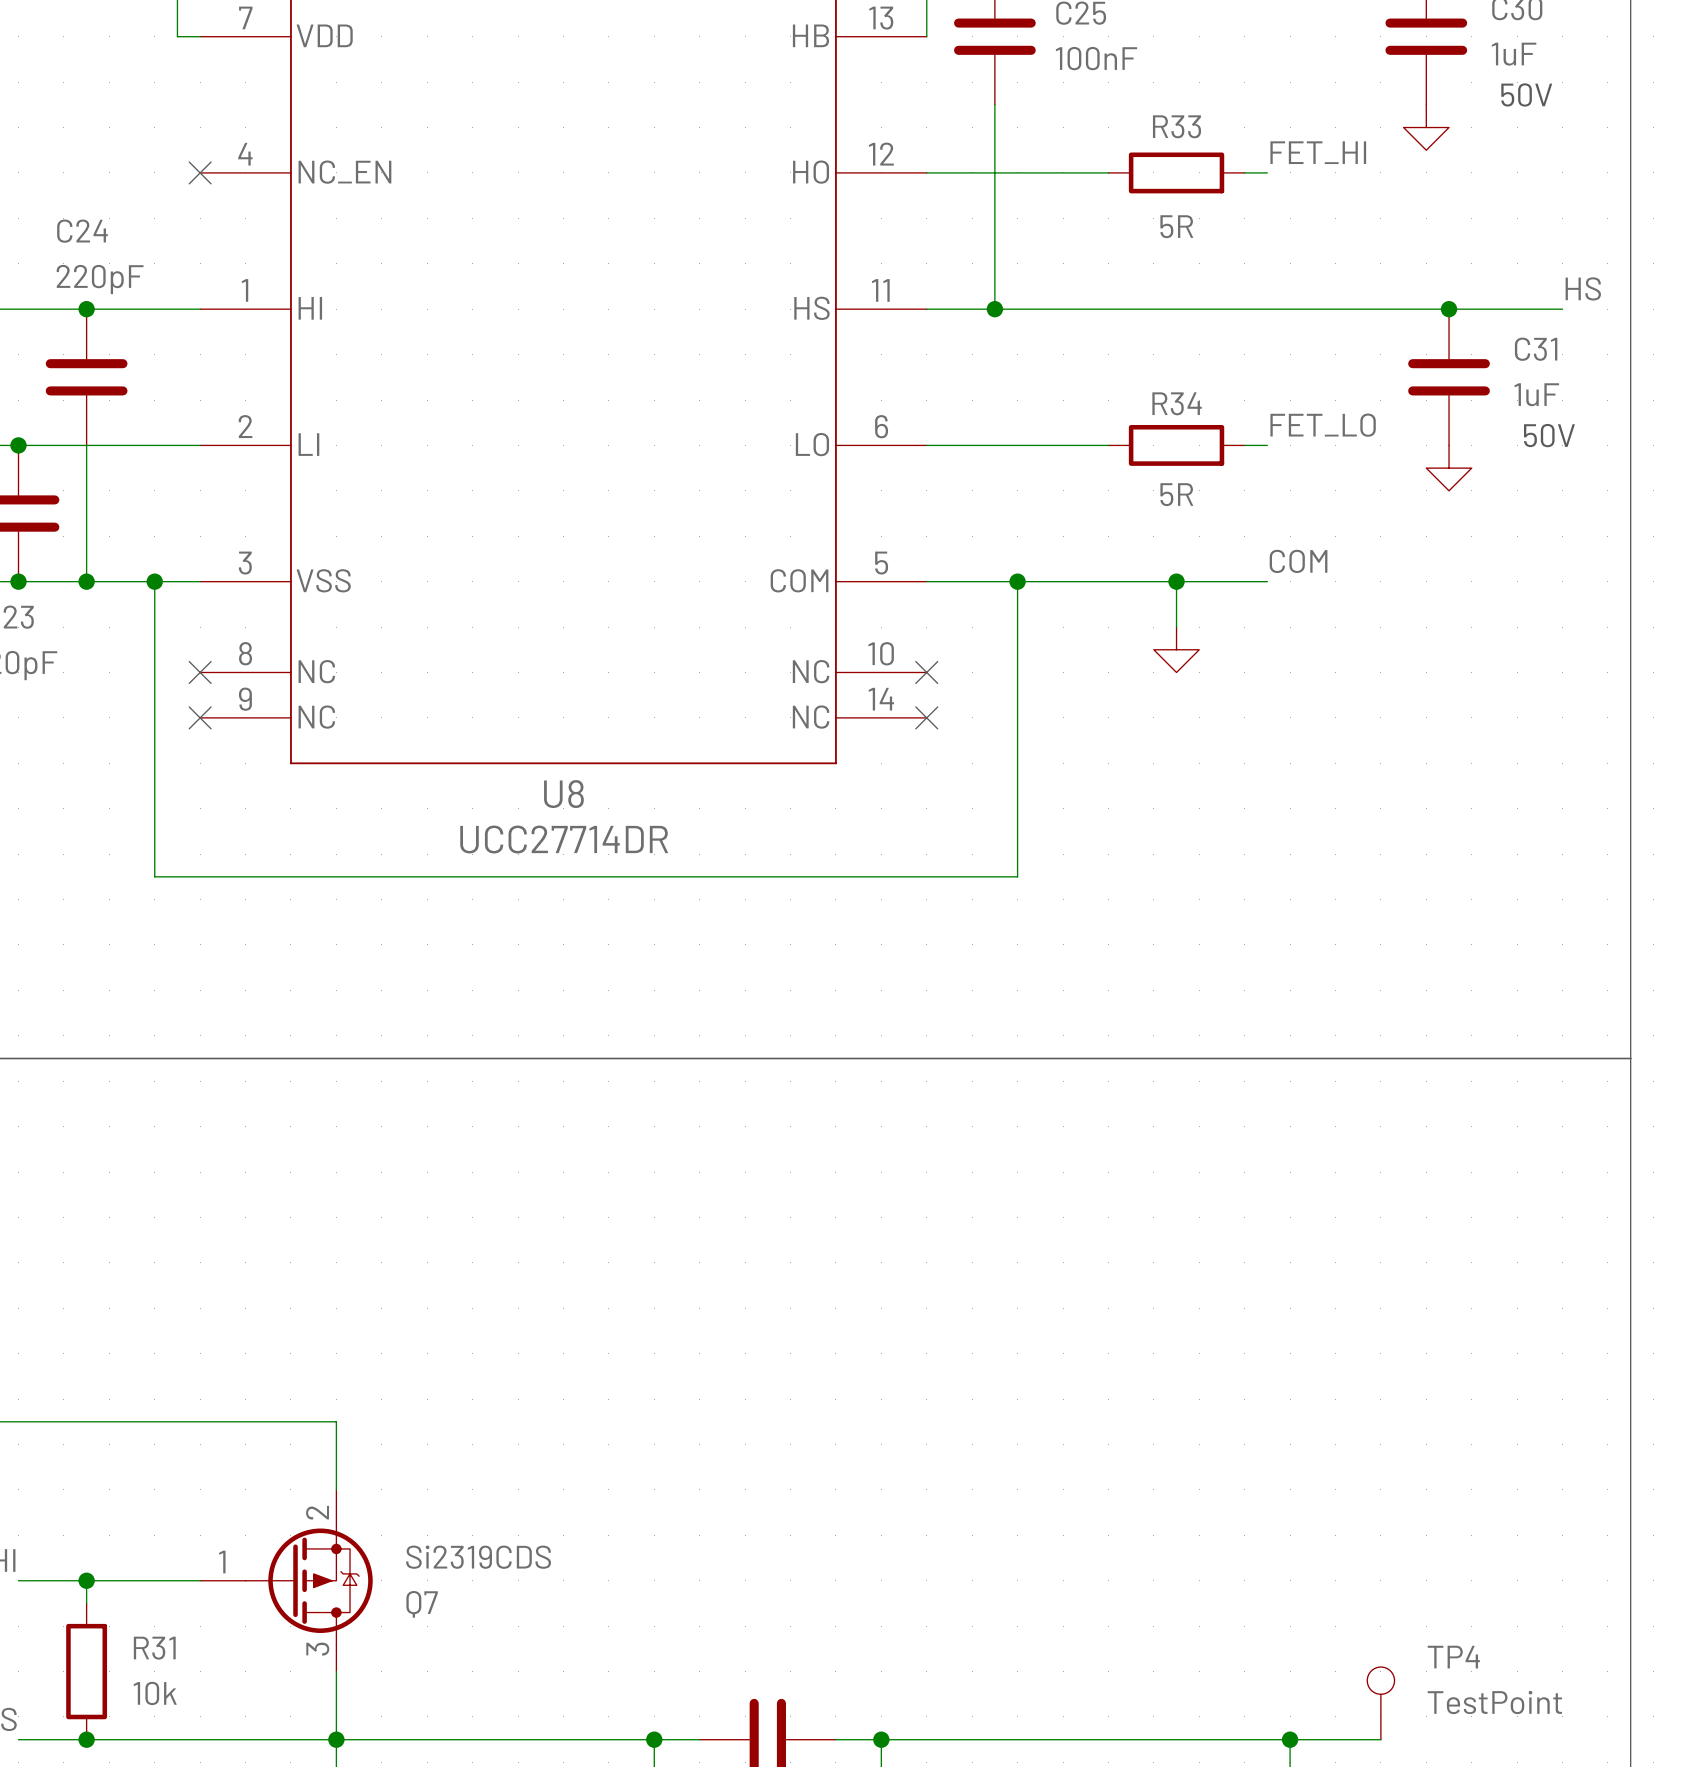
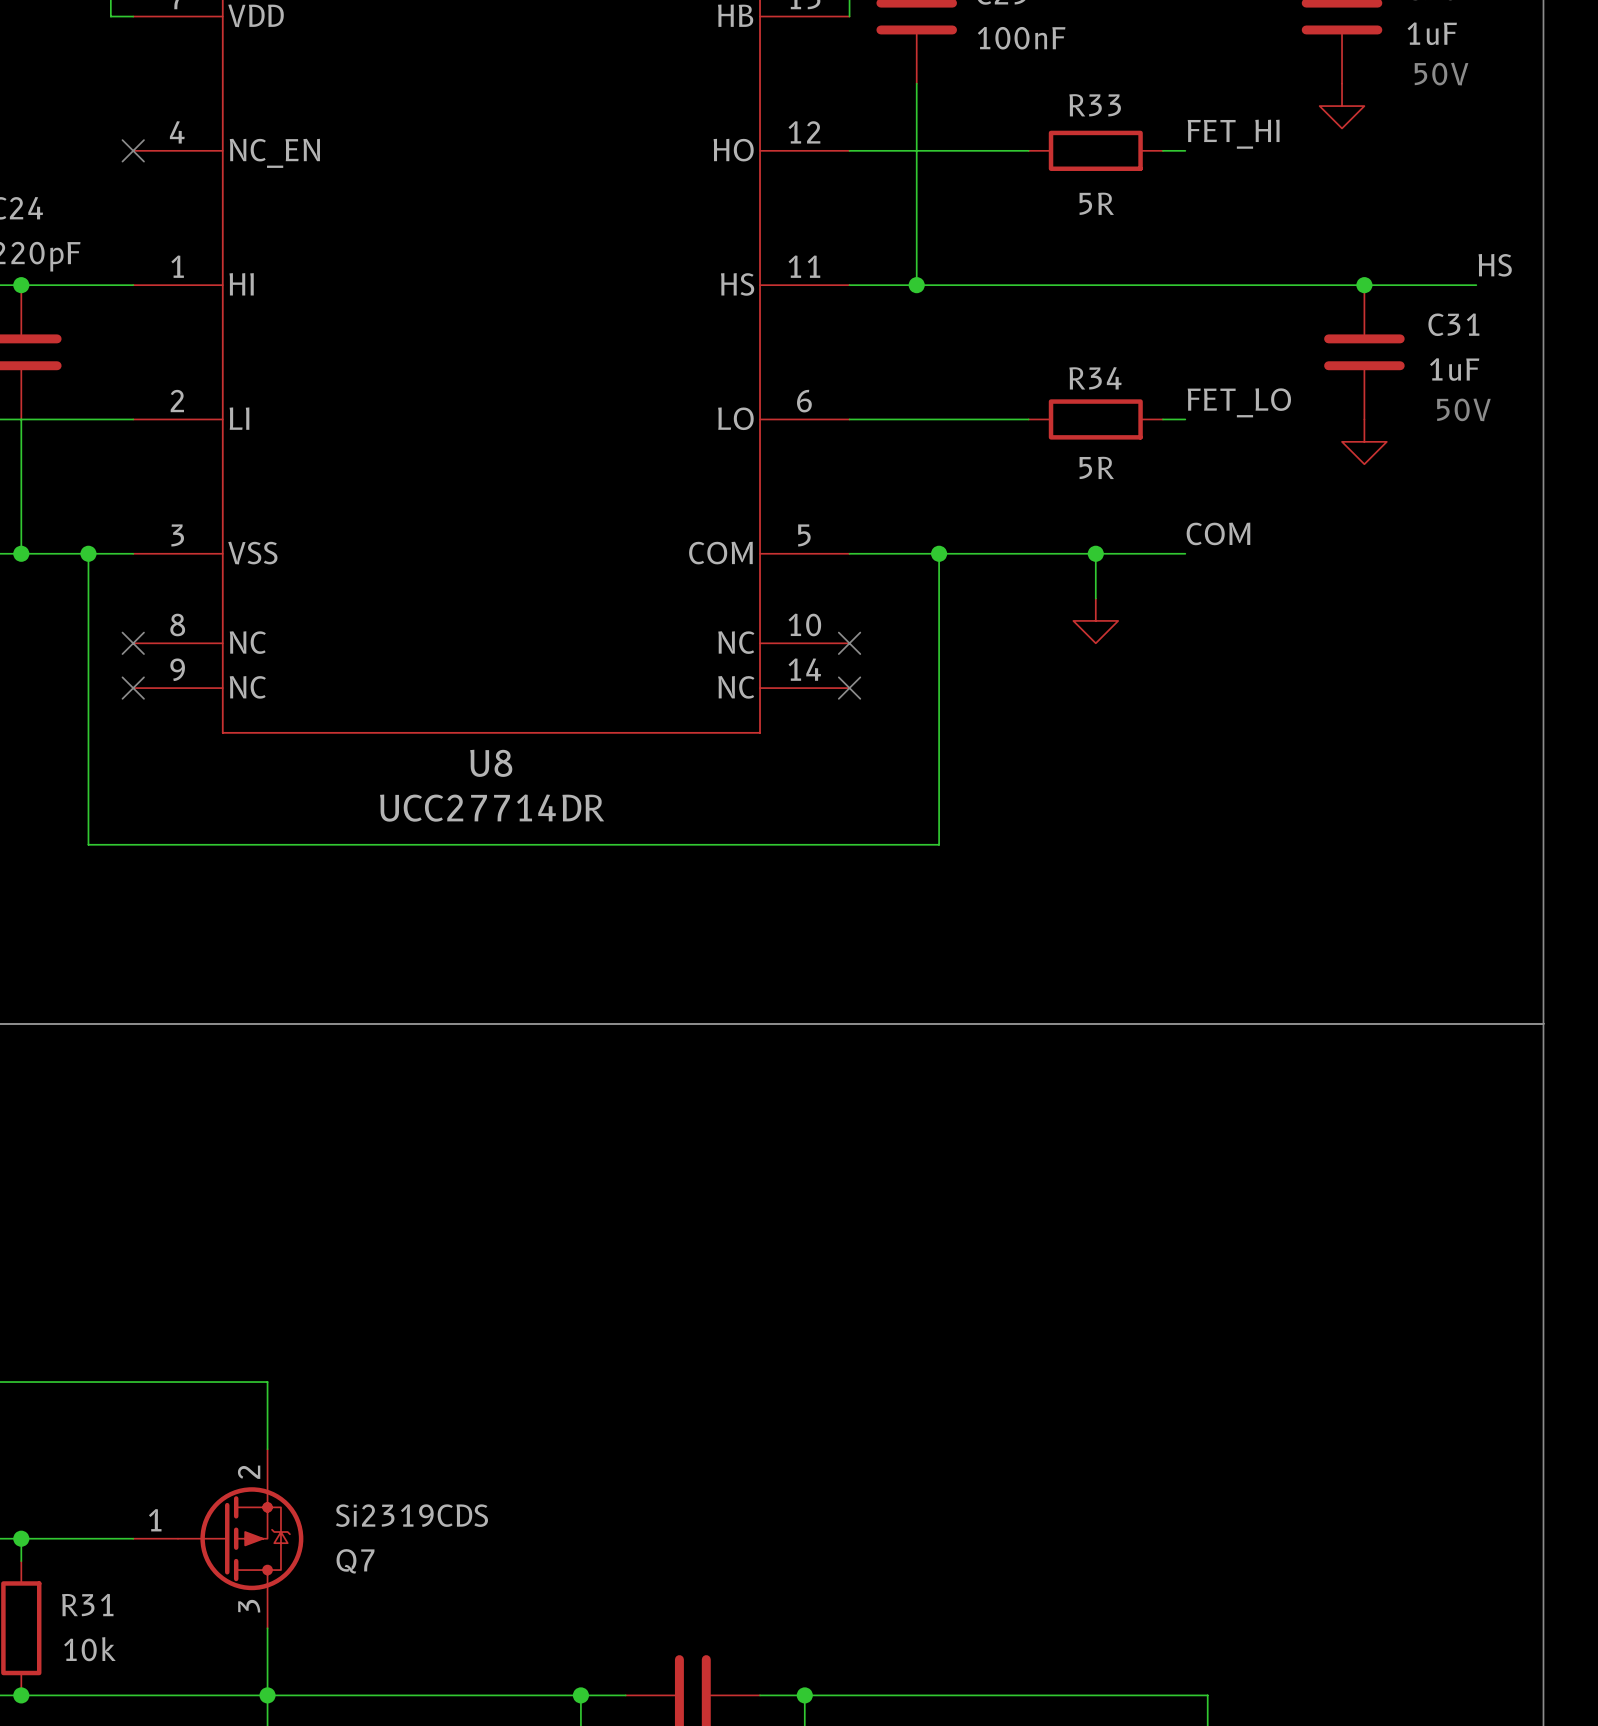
TP4: TestPoint (1380, 1703) -> none
wire: (1290, 1739) (1380, 1739) -> none
junction: (1290, 1739) -> none

